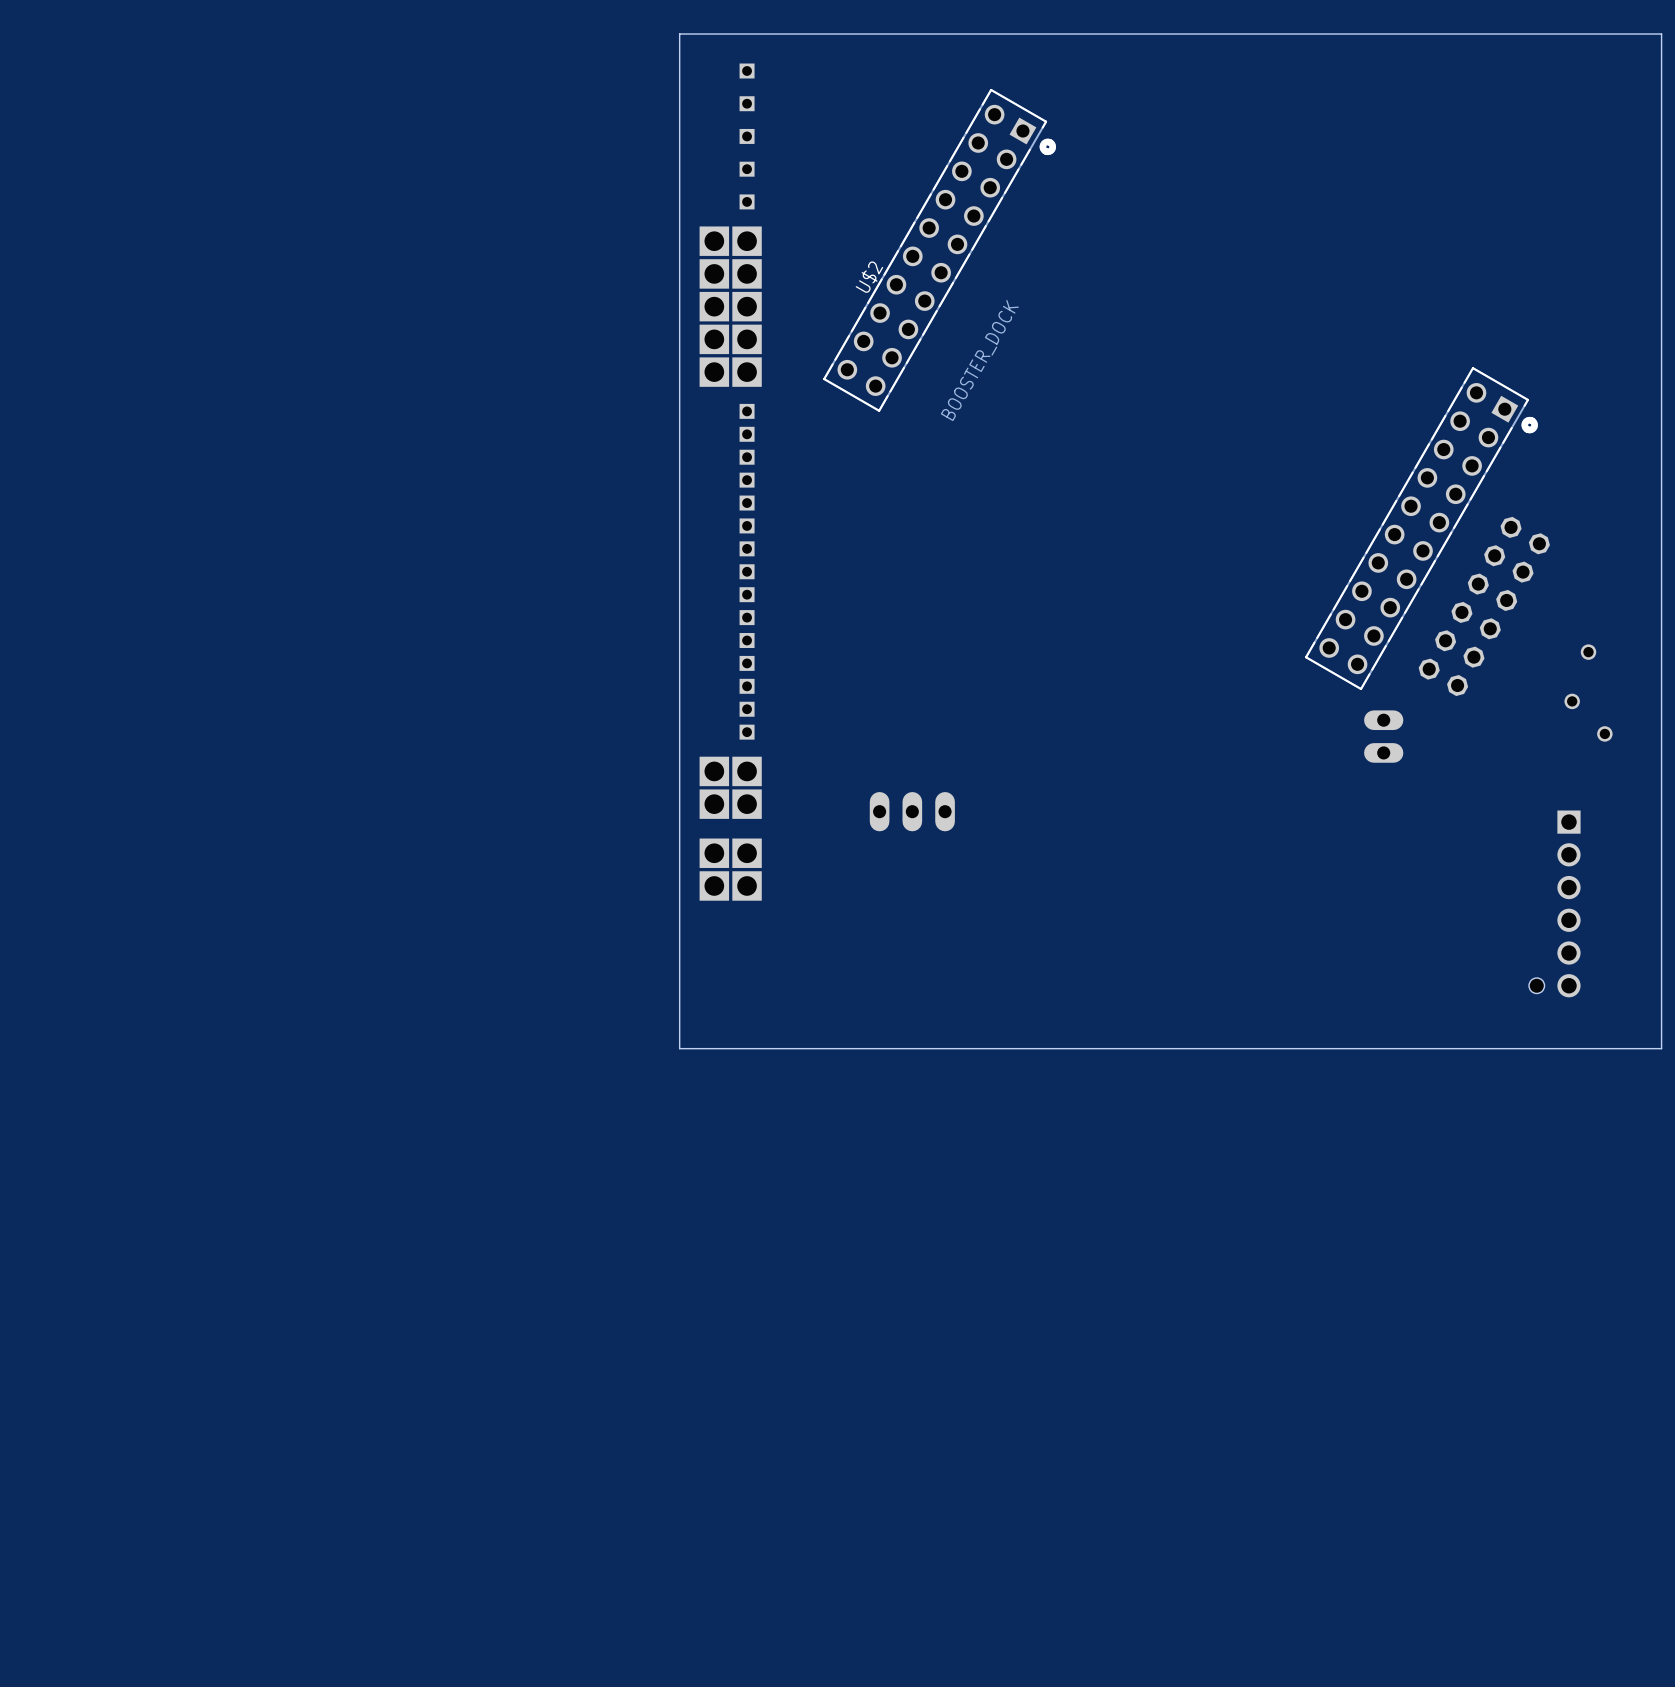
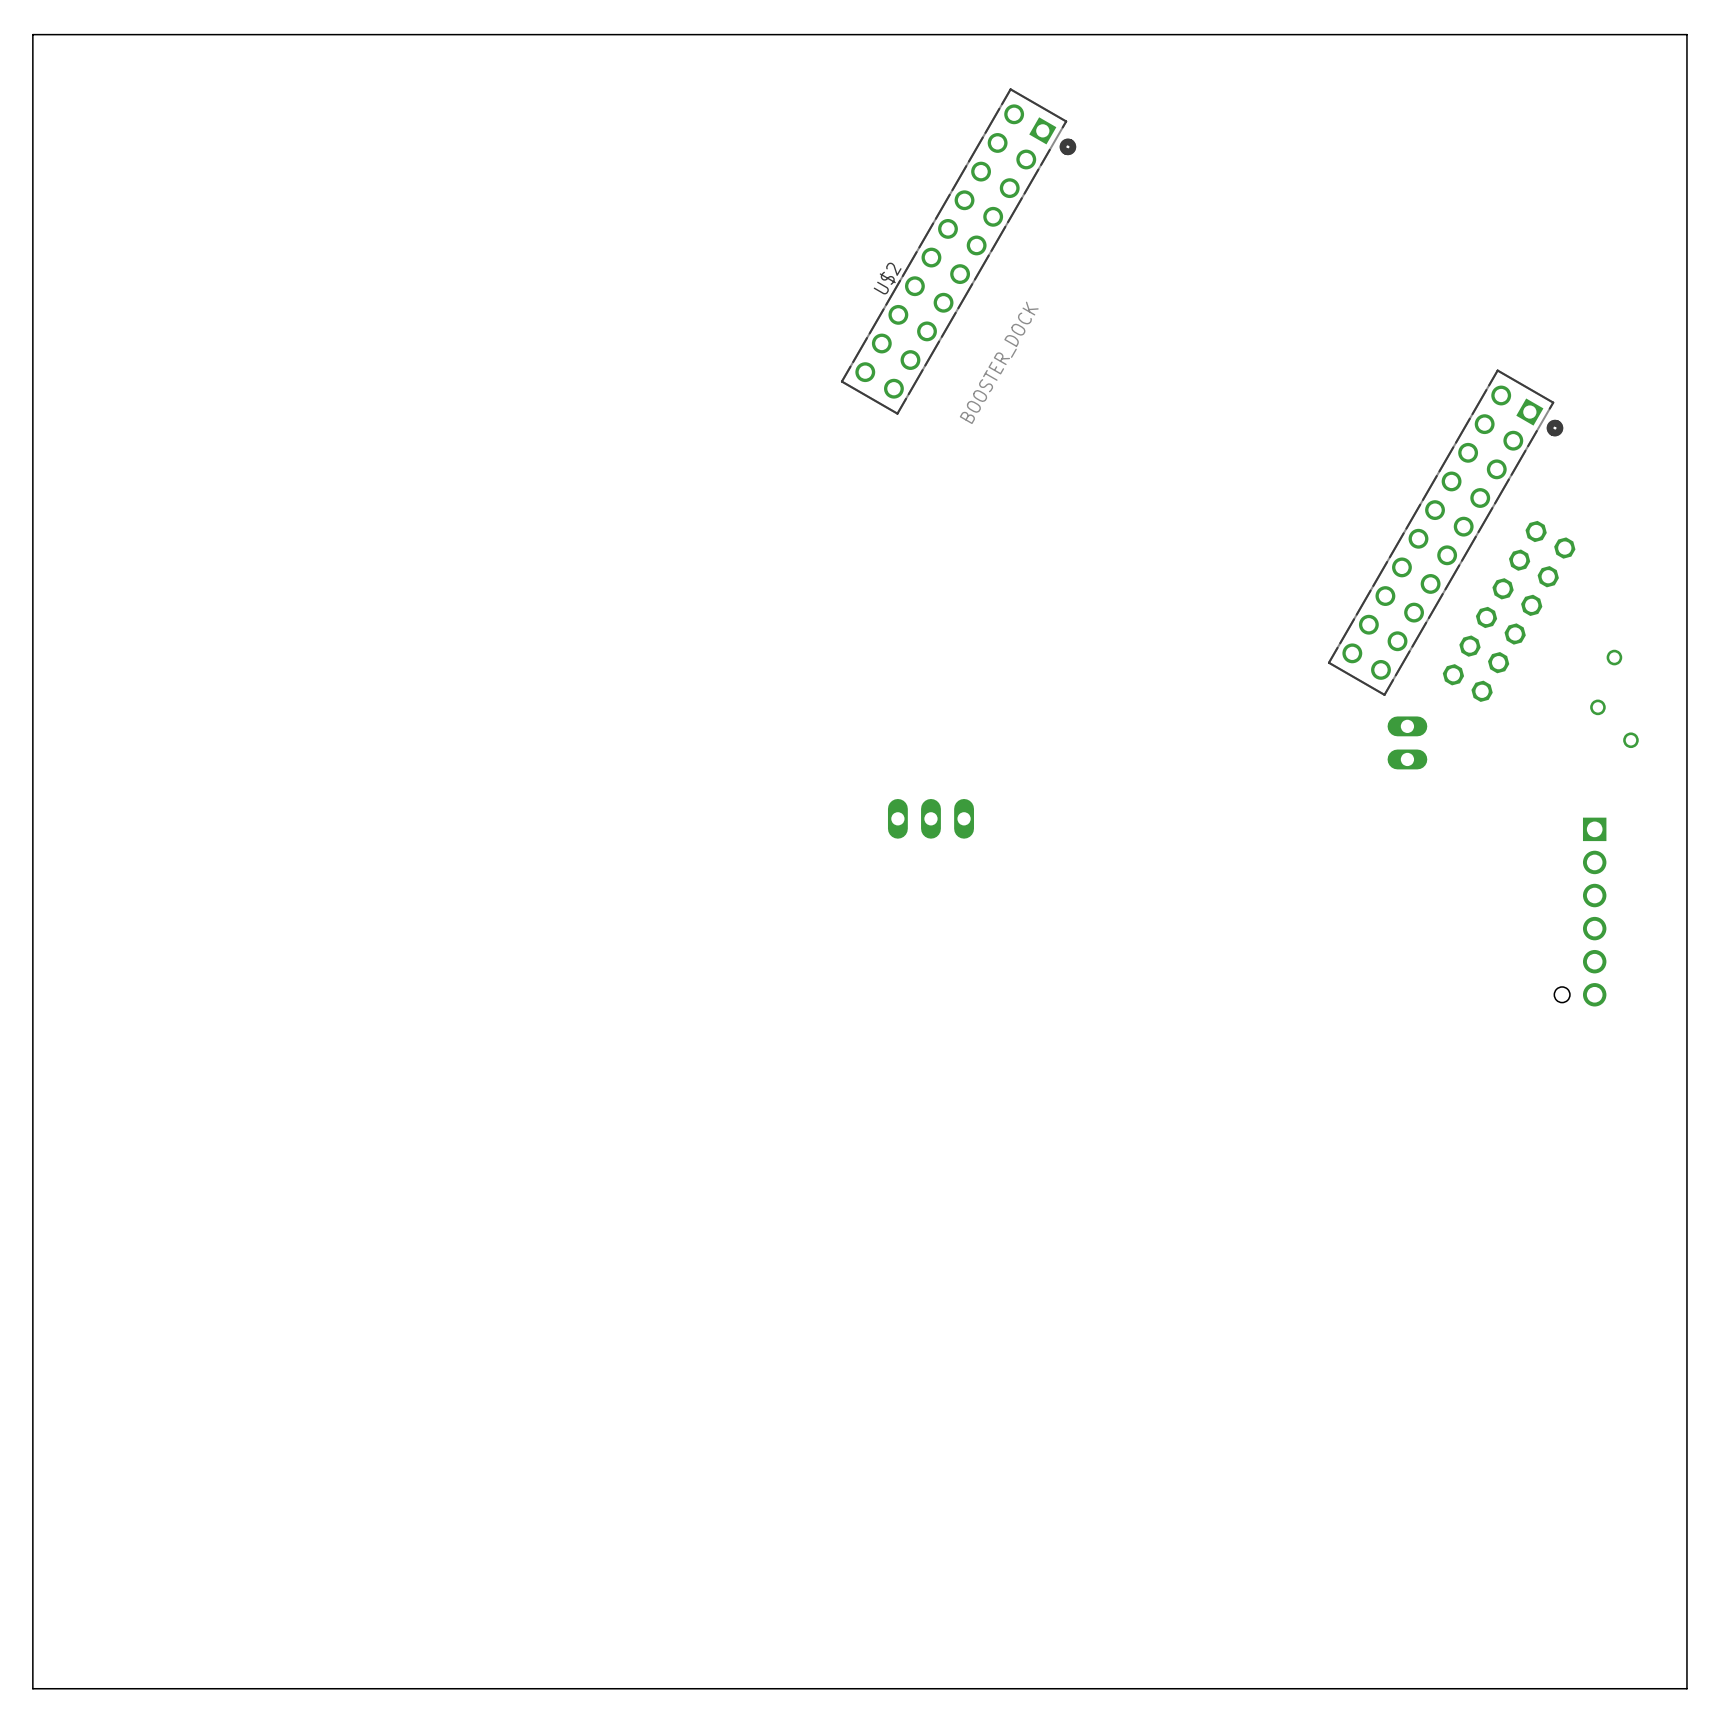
board edge: (1661, 34) (679, 34) (679, 1048) (1661, 1048) (1661, 34) -> none
board edge: none -> (1686, 34) (32, 34) (32, 1688) (1686, 1688) (1686, 34)
part: (730, 482) -> none

